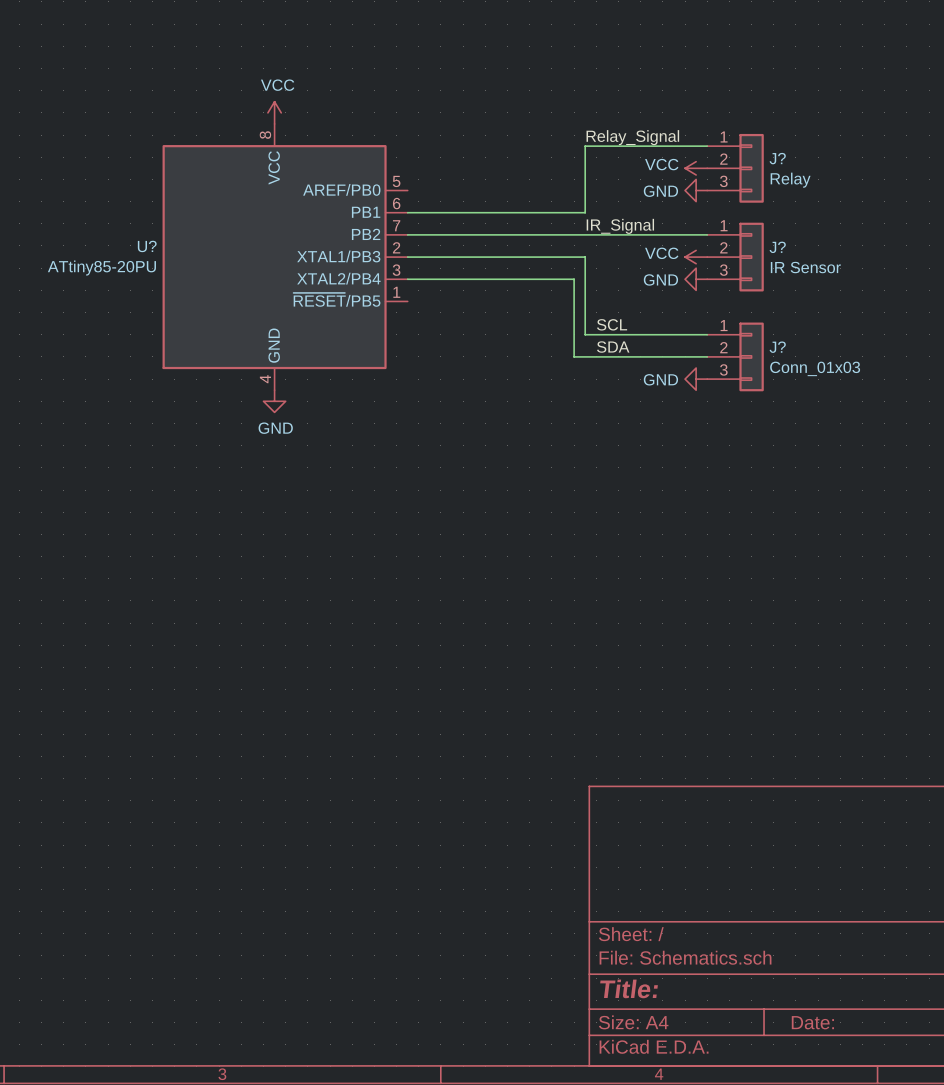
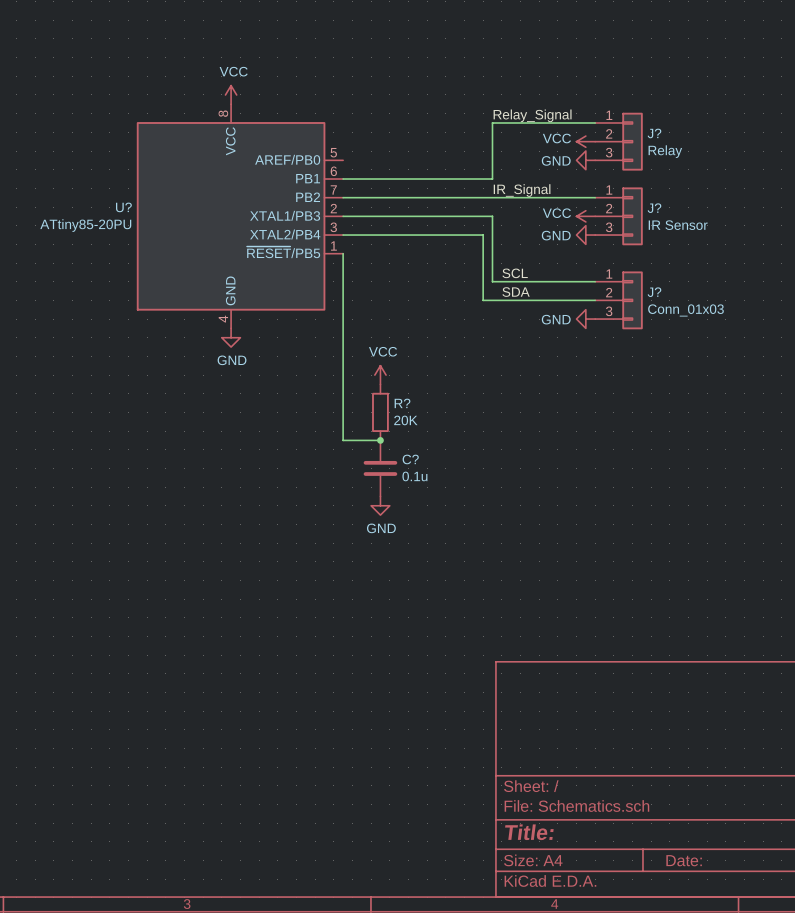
wire: none -> (343, 253) (343, 440) (380, 440)
power symbol: none -> VCC (380, 375)
R?: none -> 20K (380, 412)
junction: none -> (380, 440)
C?: none -> 0.1u (380, 468)
power symbol: none -> GND (380, 505)

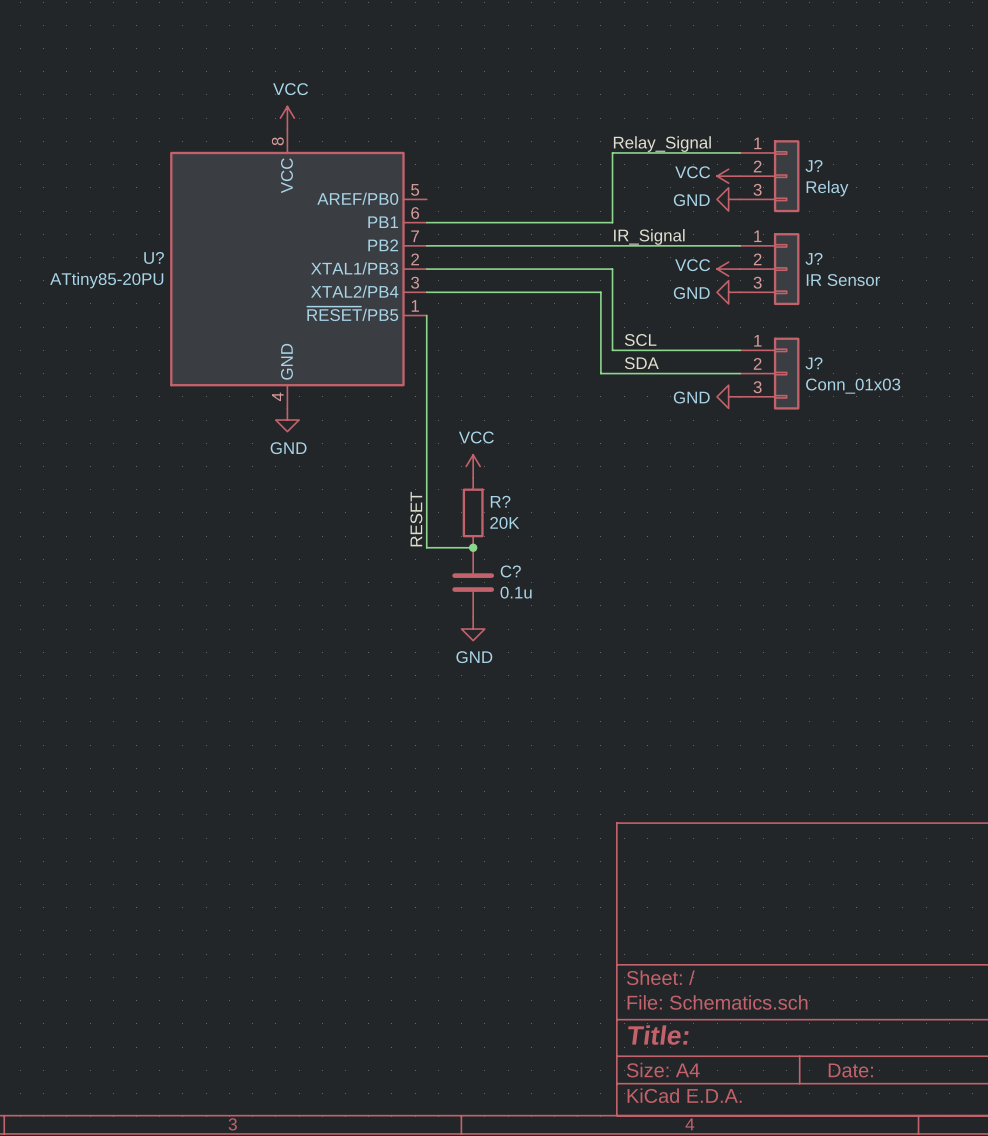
label: none -> RESET (416, 519)

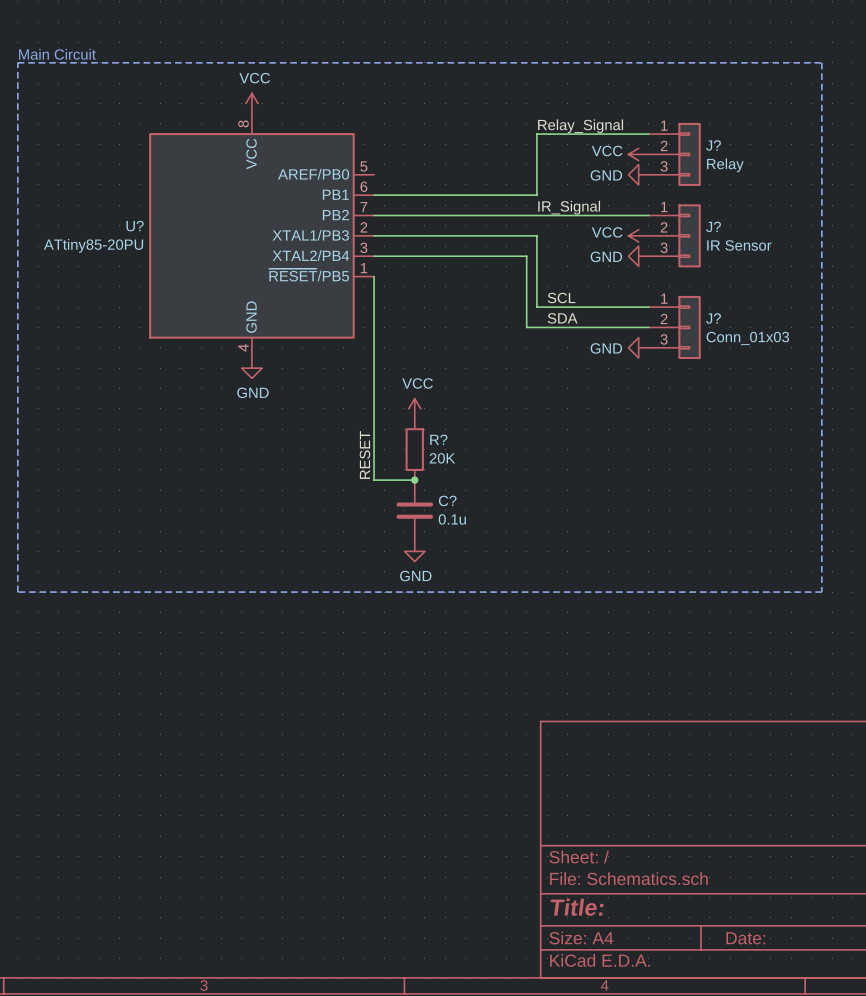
text: none -> Main Circuit (57, 54)
line: none -> (17, 62) (821, 62) (821, 592) (17, 592) (17, 62)

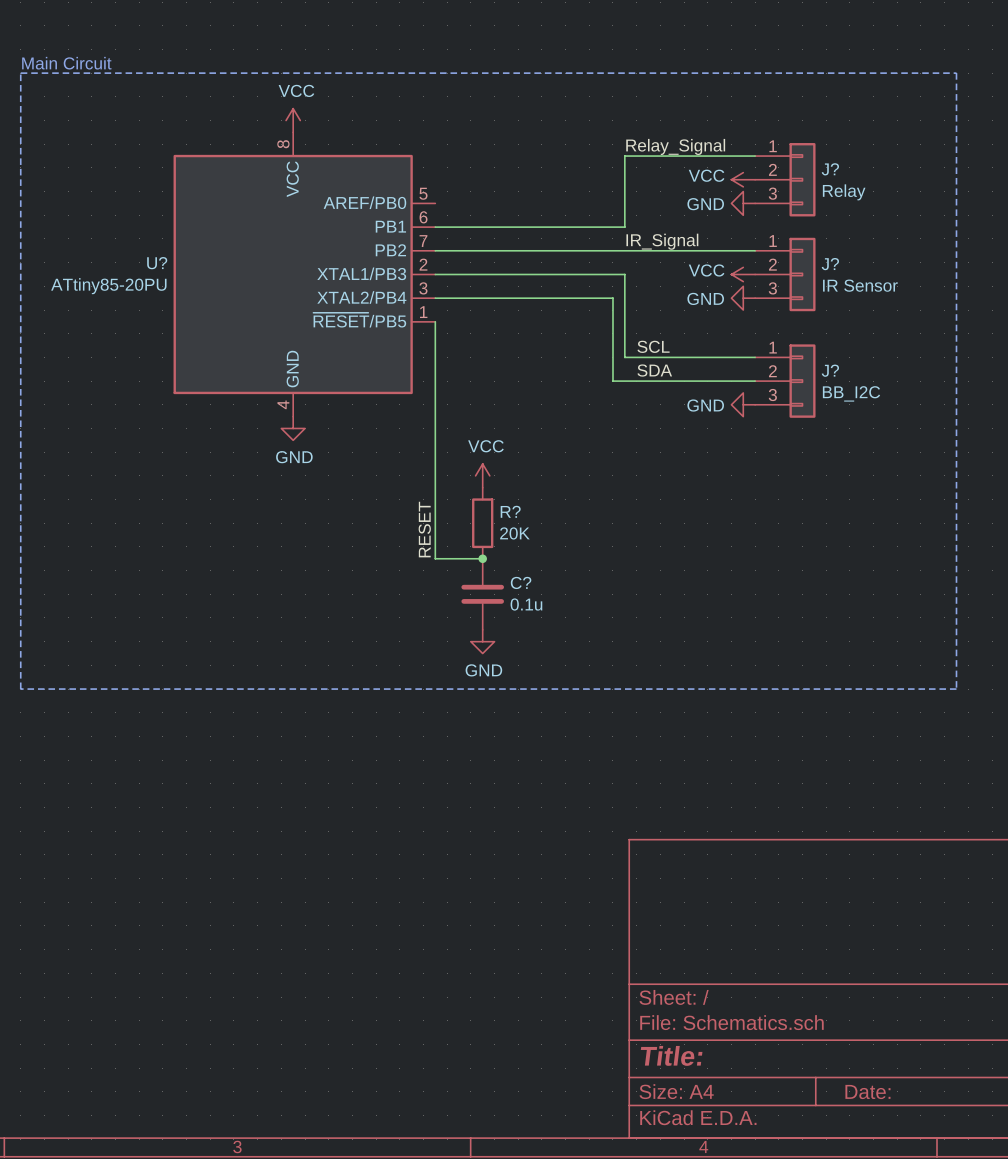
J? value: Conn_01x03 (747, 338) -> BB_I2C (851, 393)

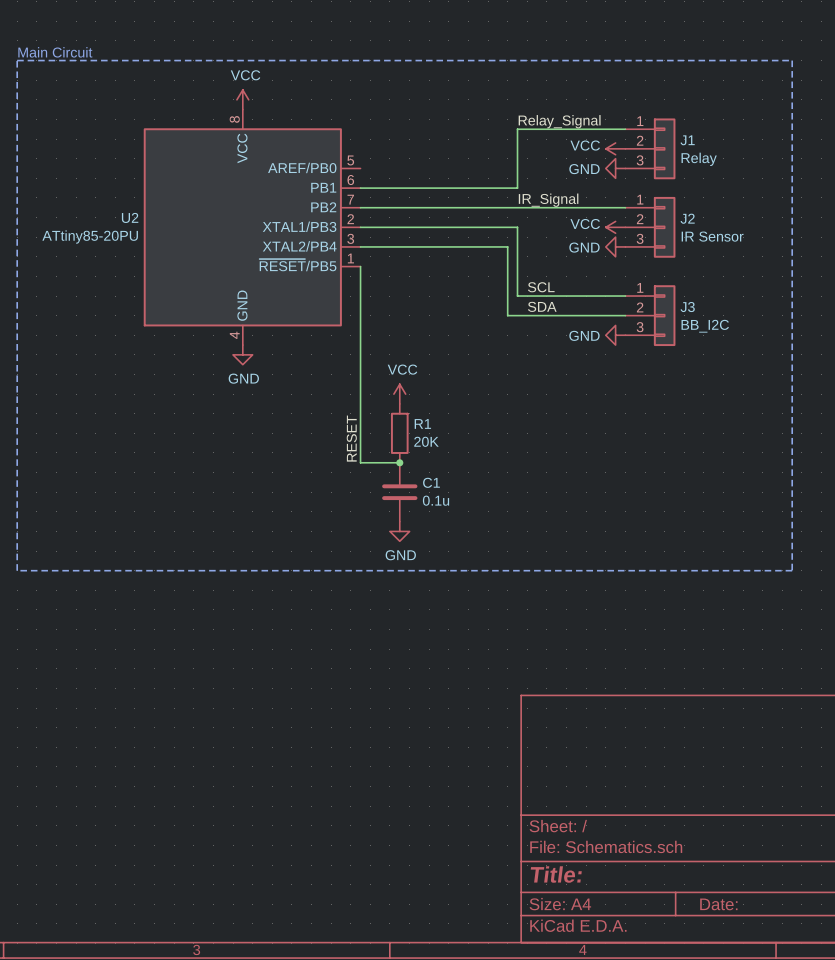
J? name: J? (830, 169) -> J1 (687, 140)
U? name: U? (157, 263) -> U2 (130, 217)
J? name: J? (830, 264) -> J2 (687, 218)
J? name: J? (830, 370) -> J3 (687, 307)
R? name: R? (510, 511) -> R1 (422, 423)
C? name: C? (521, 582) -> C1 (431, 482)

